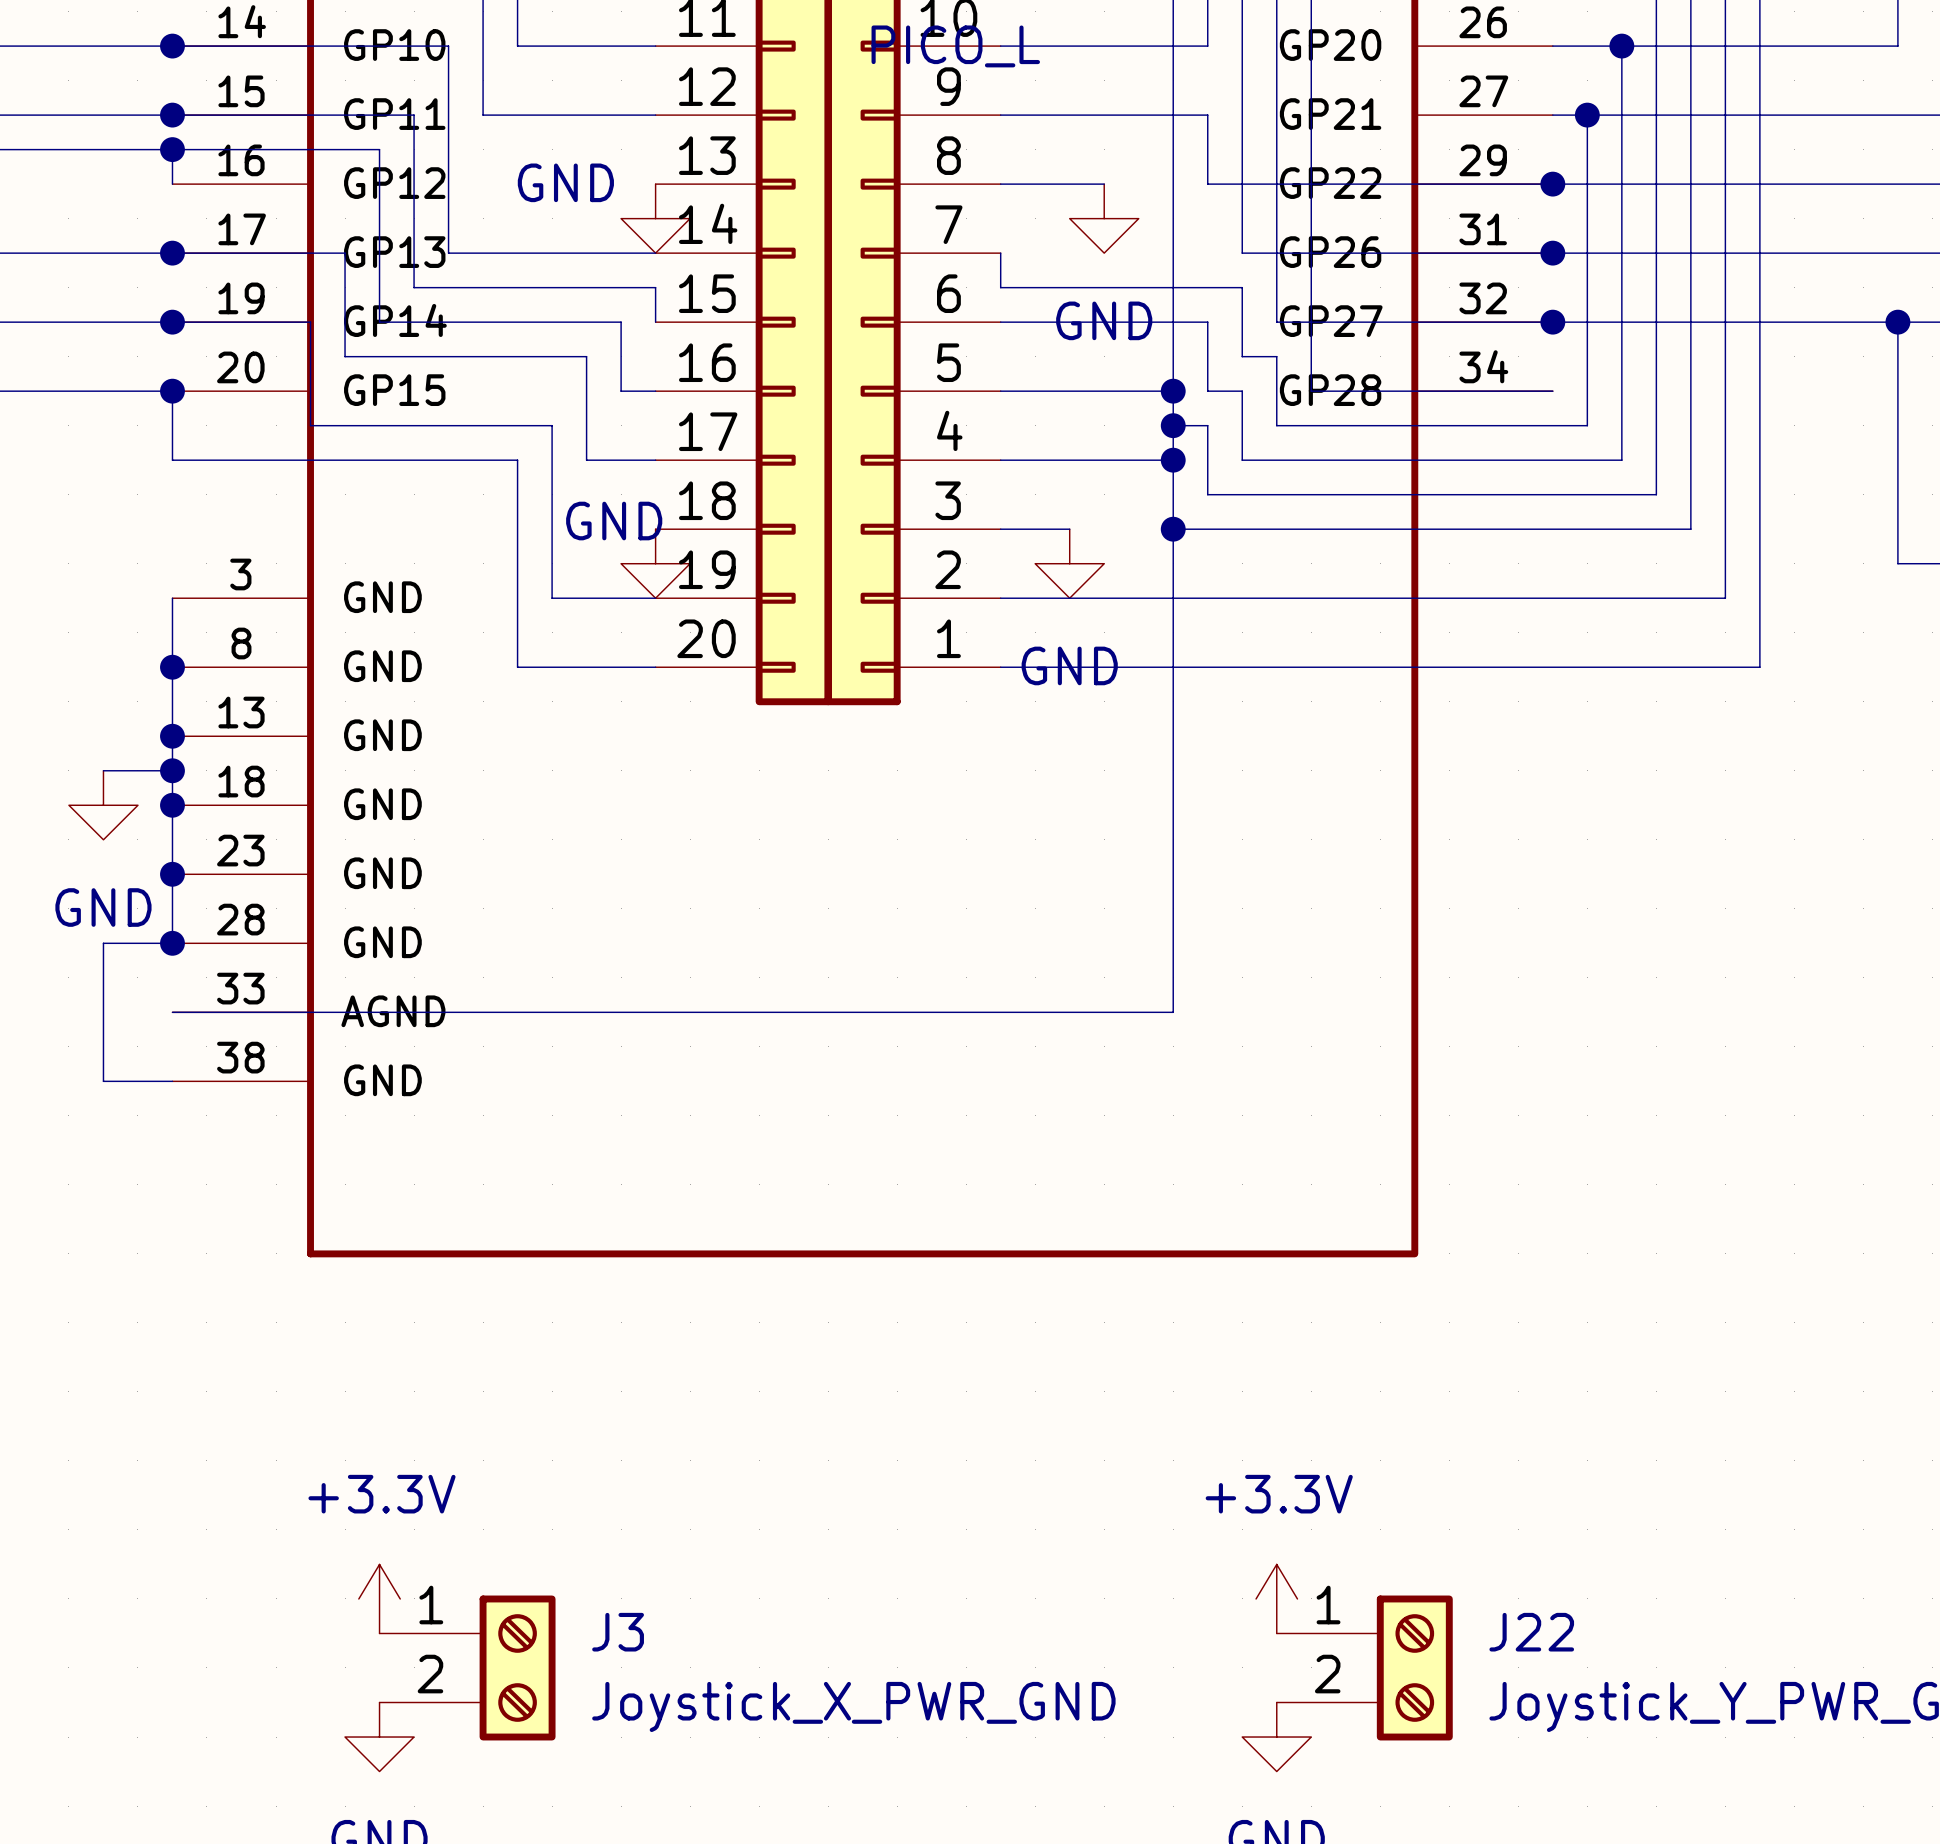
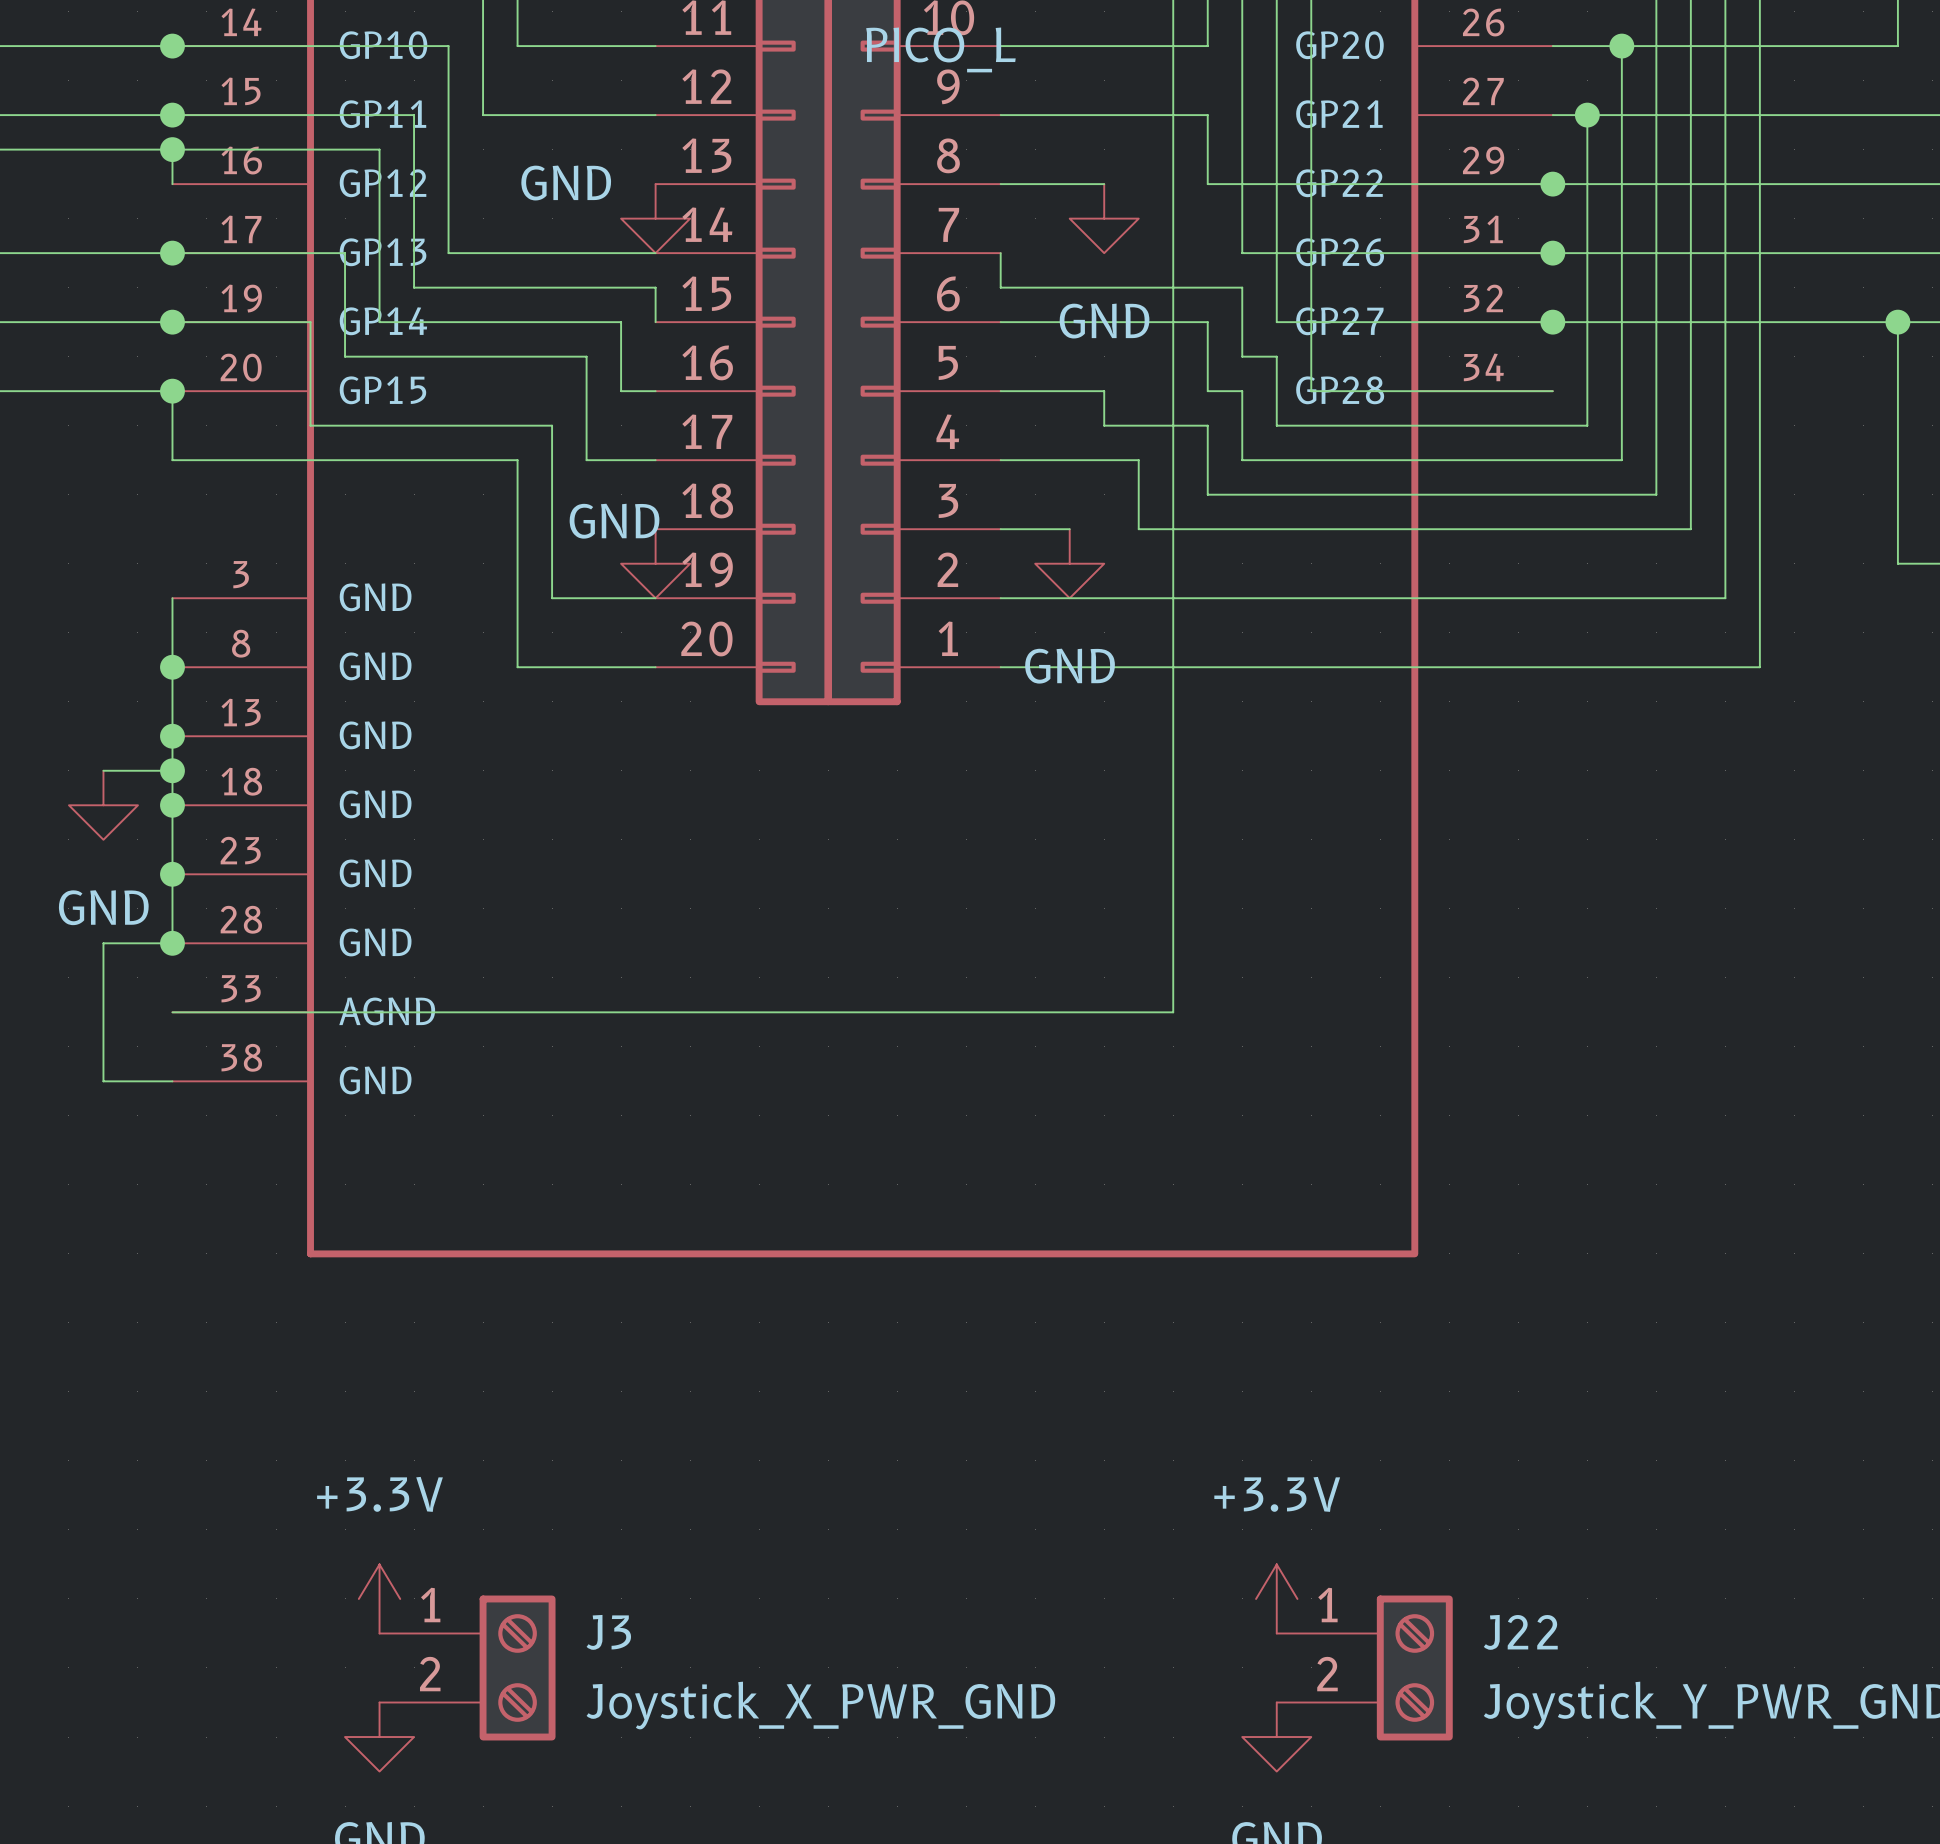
wire: (1104, 391) (1173, 391) -> (1104, 391) (1104, 425) (1173, 425)
junction: (1173, 391) -> none
junction: (1173, 425) -> none
wire: (1138, 460) (1173, 460) -> (1138, 460) (1138, 529) (1173, 529)
junction: (1173, 460) -> none
junction: (1173, 529) -> none

